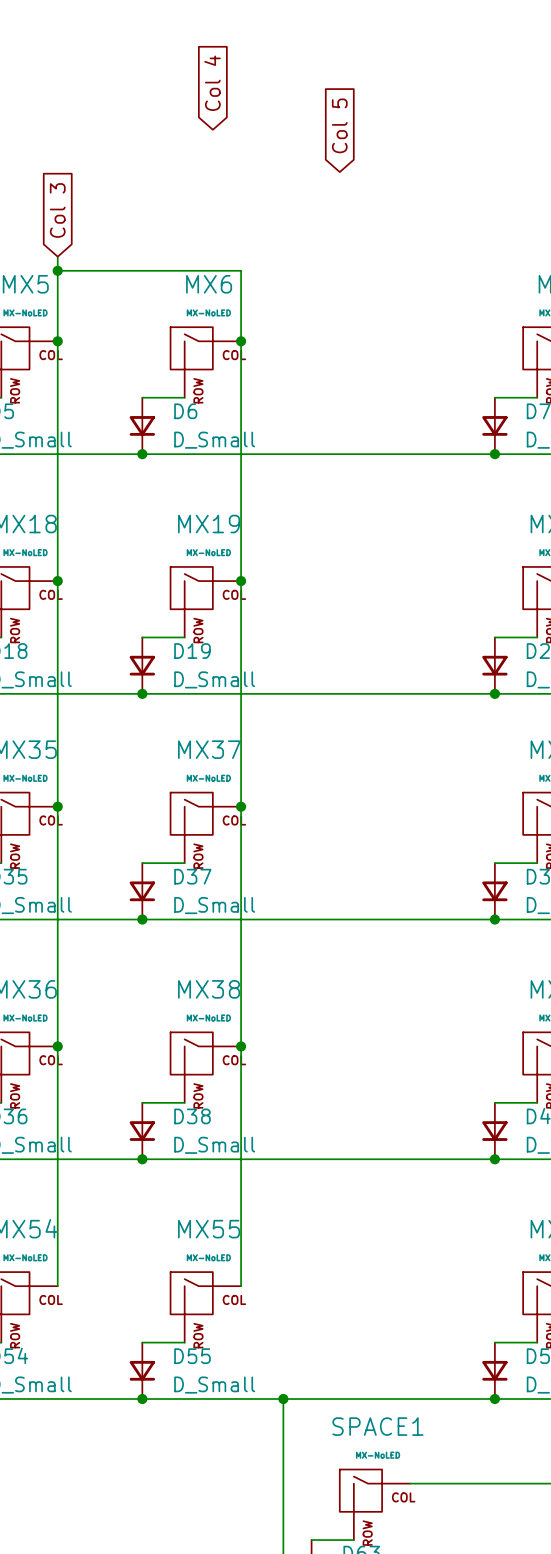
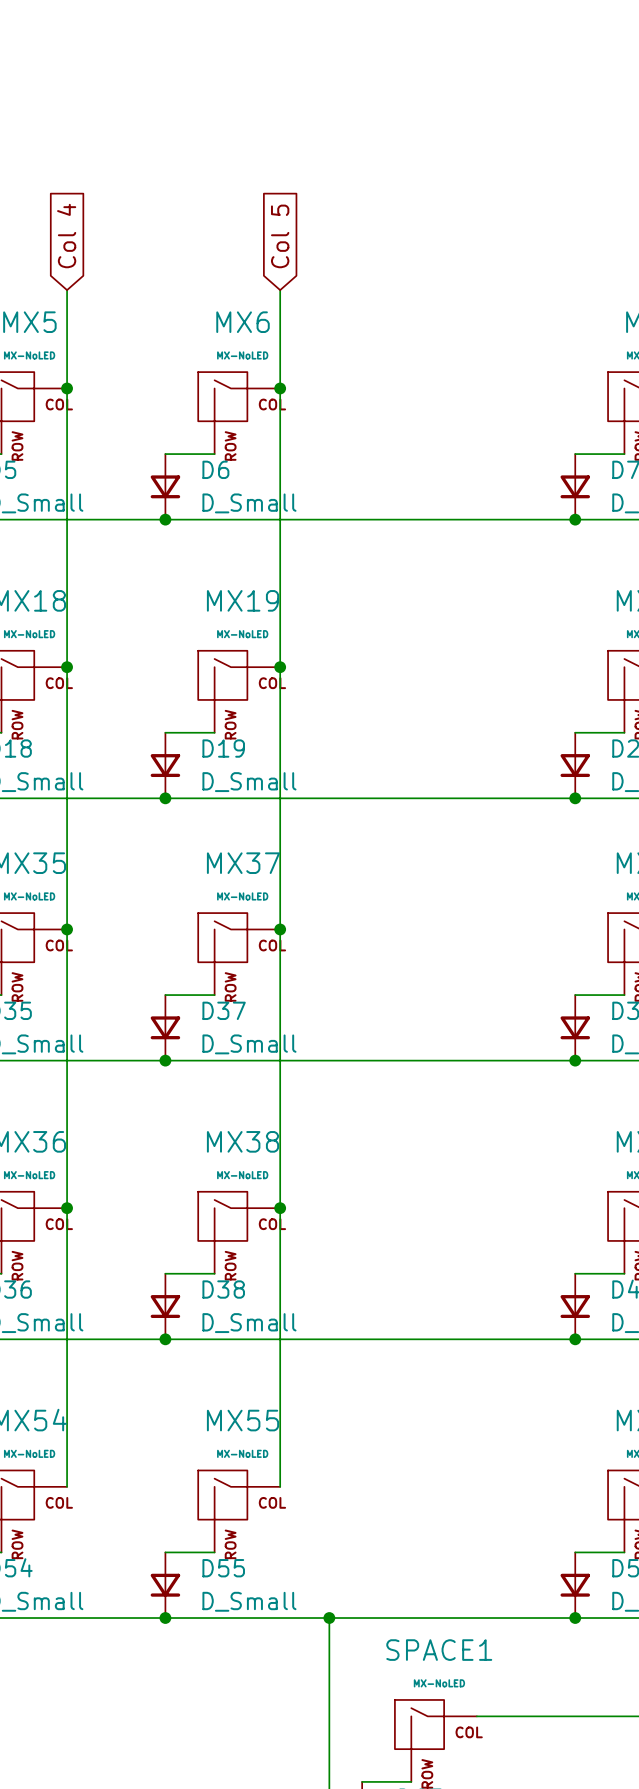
global label: Col 4 (212, 83) -> none
global label position: Col 5 (339, 125) -> Col 5 (280, 236)
global label: Col 3 (57, 210) -> Col 4 (66, 236)
wire: (57, 270) (241, 270) -> (280, 290) (280, 306)
junction: (57, 270) -> none

